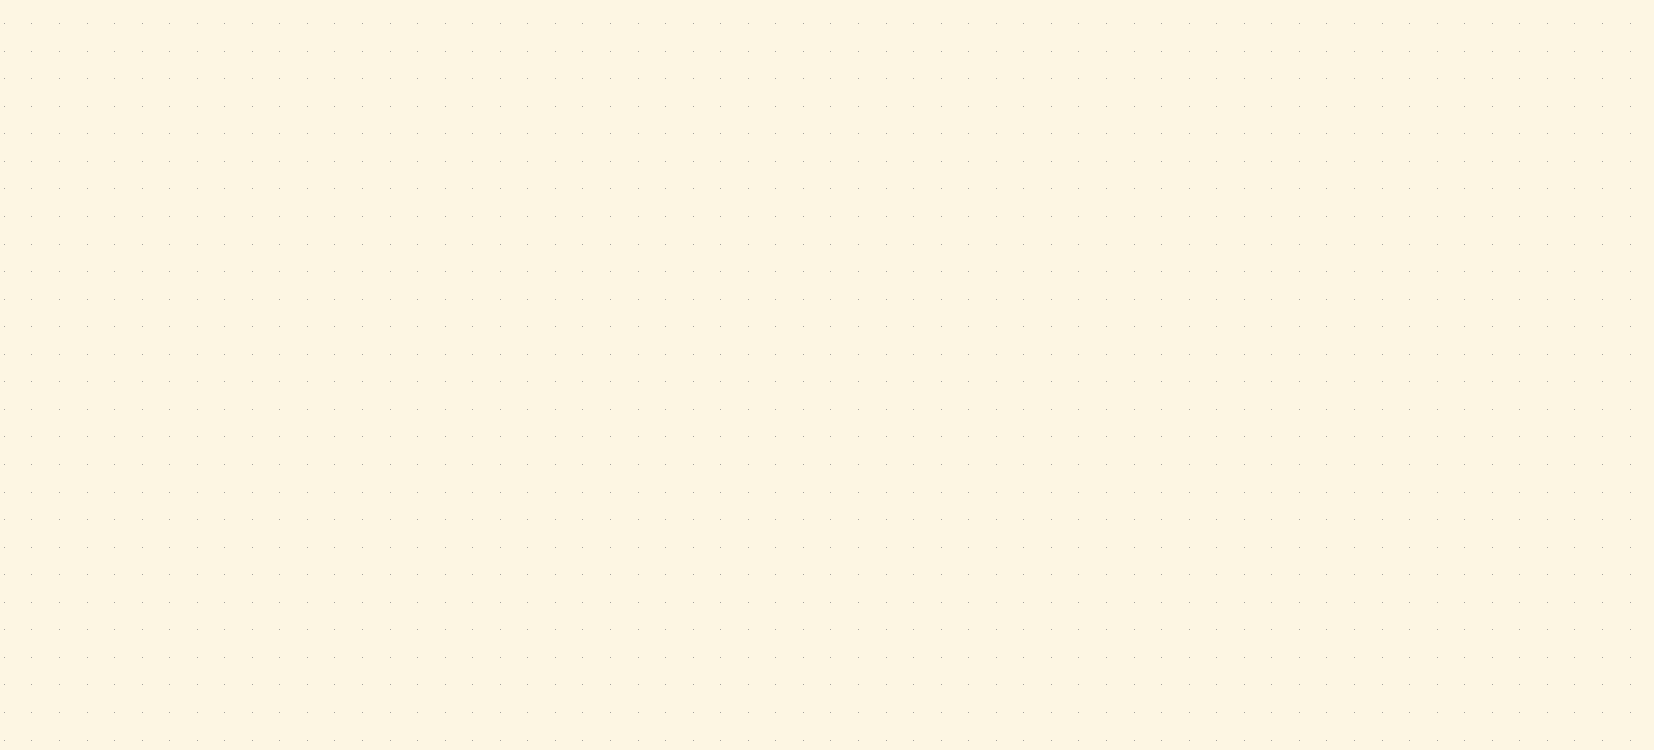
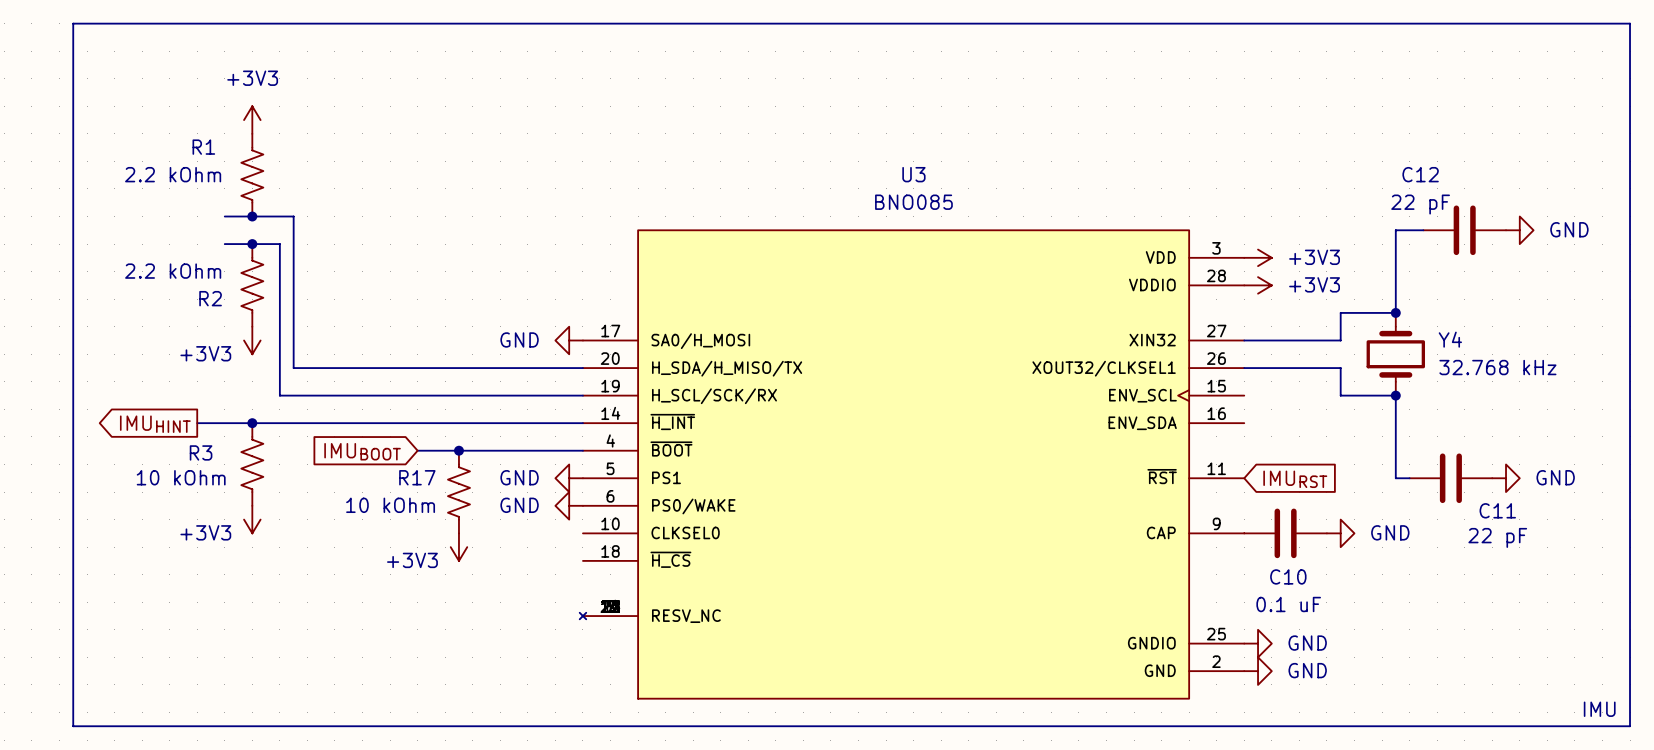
line: none -> (73, 23) (1630, 23) (1630, 726) (73, 726) (73, 23)
power symbol: none -> +3V3 (252, 120)
R1: none -> 2.2 kOhm (252, 175)
wire: none -> (224, 216) (293, 216) (293, 368) (582, 368)
junction: none -> (252, 216)
wire: none -> (1423, 230) (1395, 230) (1395, 312) (1340, 312) (1340, 340) (1244, 340)
C12: none -> 22 pF (1464, 230)
power symbol: none -> GND (1519, 230)
wire: none -> (224, 244) (279, 244) (279, 395) (582, 395)
junction: none -> (252, 244)
power symbol: none -> +3V3 (1258, 257)
R2: none -> 2.2 kOhm (252, 285)
power symbol: none -> +3V3 (1258, 285)
junction: none -> (1395, 312)
power symbol: none -> +3V3 (252, 340)
power symbol: none -> GND (569, 340)
Y4: none -> 32.768 kHz (1395, 354)
wire: none -> (1244, 368) (1340, 368) (1340, 395) (1395, 395) (1395, 478) (1409, 478)
junction: none -> (1395, 395)
wire: none -> (197, 423) (582, 423)
junction: none -> (252, 423)
global label: none -> IMUHINT (155, 424)
wire: none -> (417, 450) (582, 450)
junction: none -> (458, 450)
global label: none -> IMUBOOT (362, 451)
R3: none -> 10 kOhm (252, 464)
U3: none -> BNO085 (911, 464)
power symbol: none -> GND (569, 478)
C11: none -> 22 pF (1450, 478)
power symbol: none -> GND (1506, 478)
global label: none -> IMURST (1295, 479)
R17: none -> 10 kOhm (458, 492)
power symbol: none -> GND (569, 505)
power symbol: none -> +3V3 (252, 519)
C10: none -> 0.1 uF (1285, 533)
power symbol: none -> GND (1340, 533)
power symbol: none -> +3V3 (458, 547)
power symbol: none -> GND (1258, 643)
power symbol: none -> GND (1258, 671)
text: none -> IMU (1599, 709)

